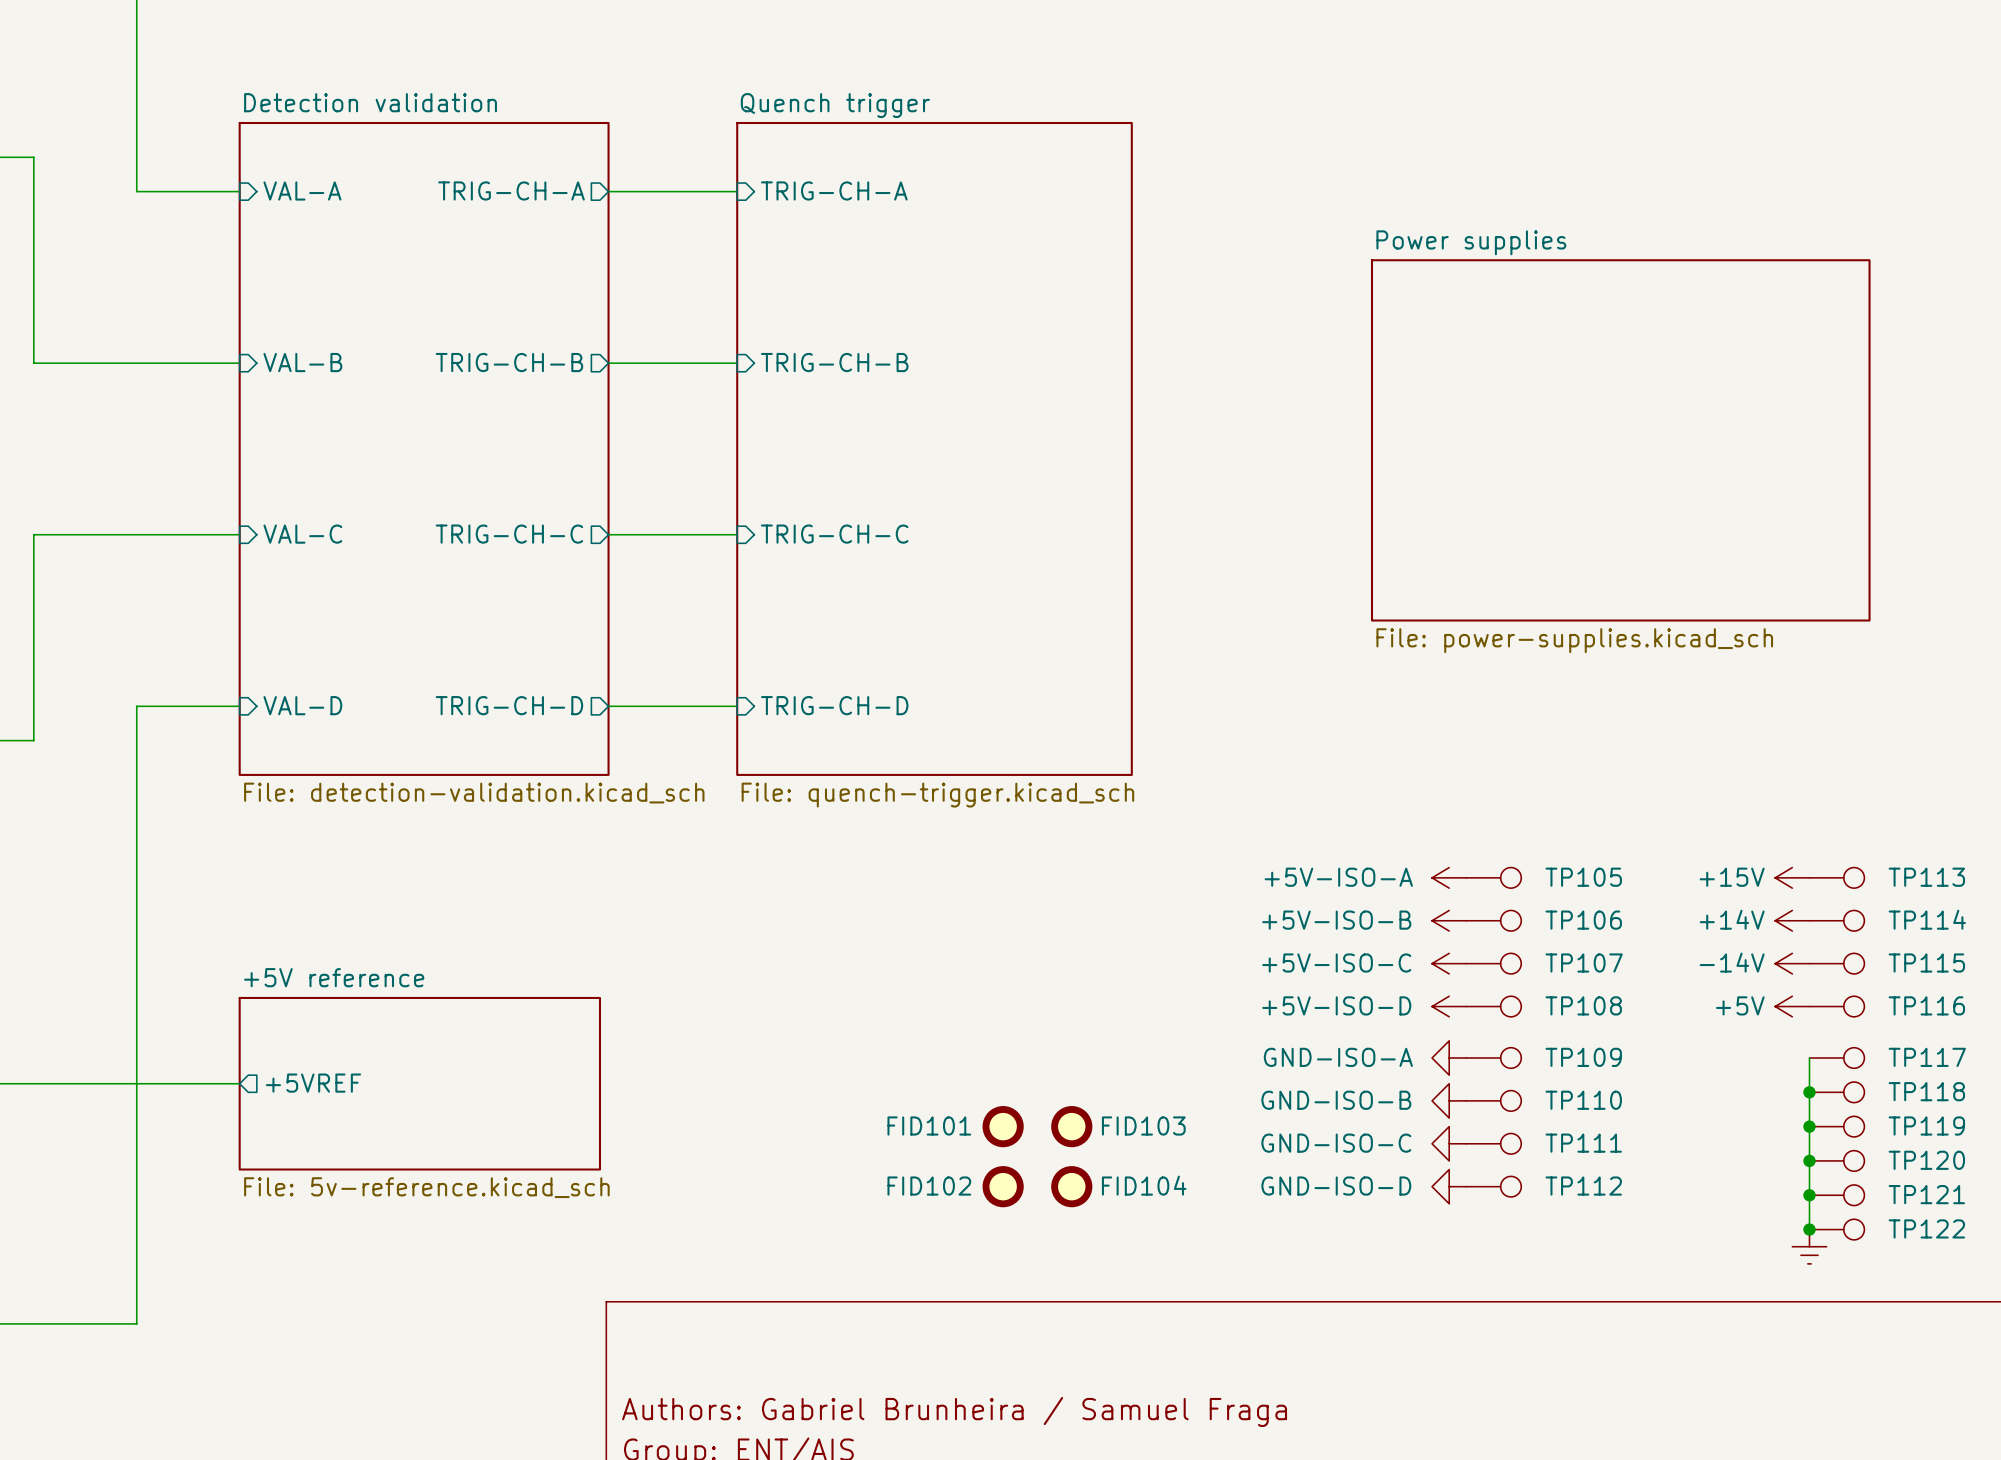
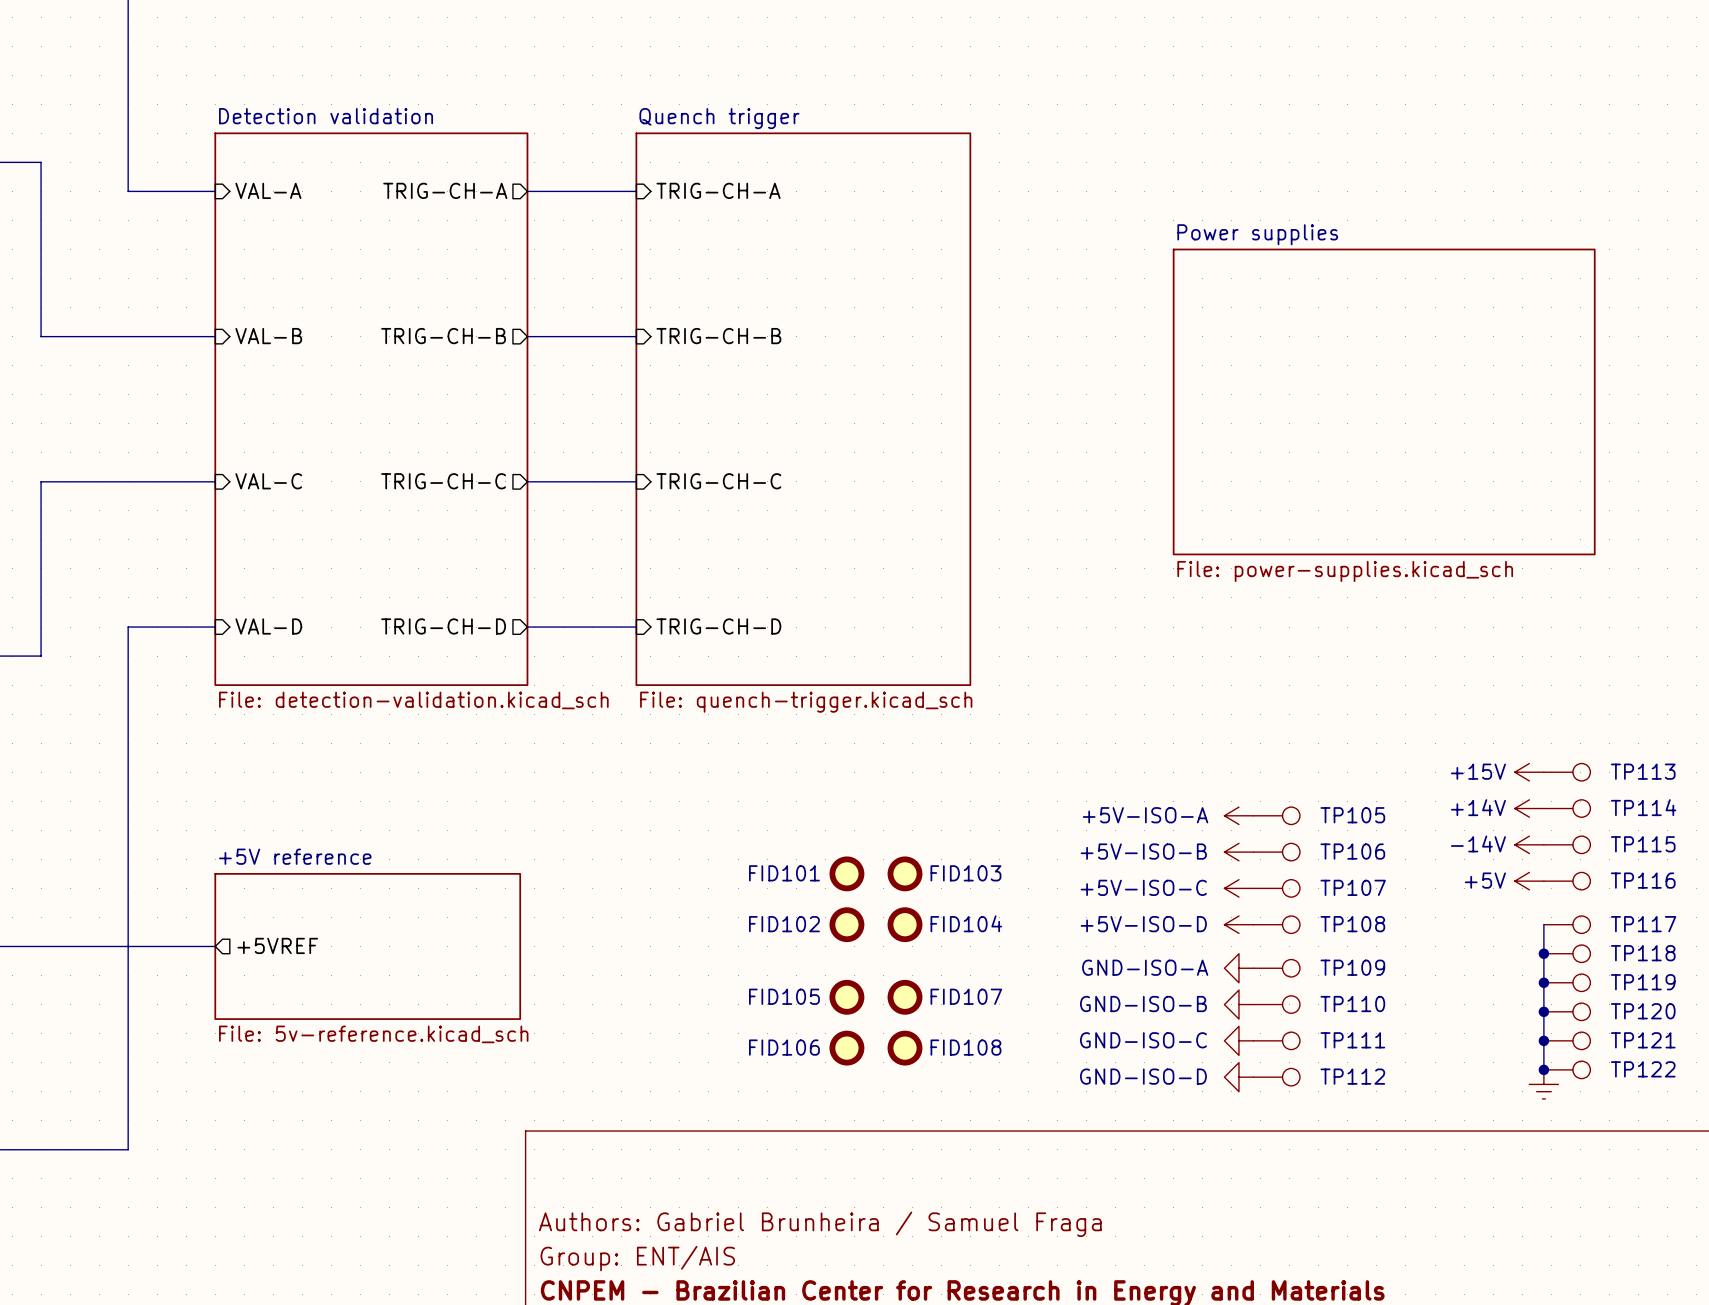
power symbol: +5V-ISO-A (1449, 877) -> none
TP105 position: (1493, 877) -> (1276, 815)
power symbol: +5V-ISO-B (1449, 920) -> +5V-ISO-A (1238, 815)
TP106 position: (1493, 920) -> (1276, 852)
power symbol: +5V-ISO-C (1449, 963) -> +5V-ISO-B (1238, 852)
TP107 position: (1493, 963) -> (1276, 888)
power symbol: +5V-ISO-D (1449, 1006) -> +5V-ISO-C (1238, 888)
TP108: (1493, 1006) -> none
TP109 name: TP109 (1583, 1057) -> TP108 (1352, 924)
power symbol: GND-ISO-A (1449, 1058) -> +5V-ISO-D (1238, 924)
power symbol: GND-ISO-B (1449, 1100) -> GND-ISO-A (1238, 968)
TP110 position: (1493, 1100) -> (1276, 1004)
TP109: none -> (1276, 968)
FID101 position: (1003, 1126) -> (846, 873)
FID103 position: (1071, 1126) -> (905, 873)
FID105: none -> (846, 997)
FID107: none -> (905, 997)
power symbol: GND-ISO-C (1449, 1143) -> GND-ISO-B (1238, 1004)
TP111 position: (1493, 1143) -> (1276, 1040)
FID102 position: (1003, 1186) -> (846, 924)
FID104 position: (1071, 1186) -> (905, 924)
power symbol: GND-ISO-D (1449, 1186) -> GND-ISO-C (1238, 1040)
TP112 position: (1493, 1186) -> (1276, 1077)
FID106: none -> (846, 1048)
FID108: none -> (905, 1048)
power symbol: none -> GND-ISO-D (1238, 1077)

